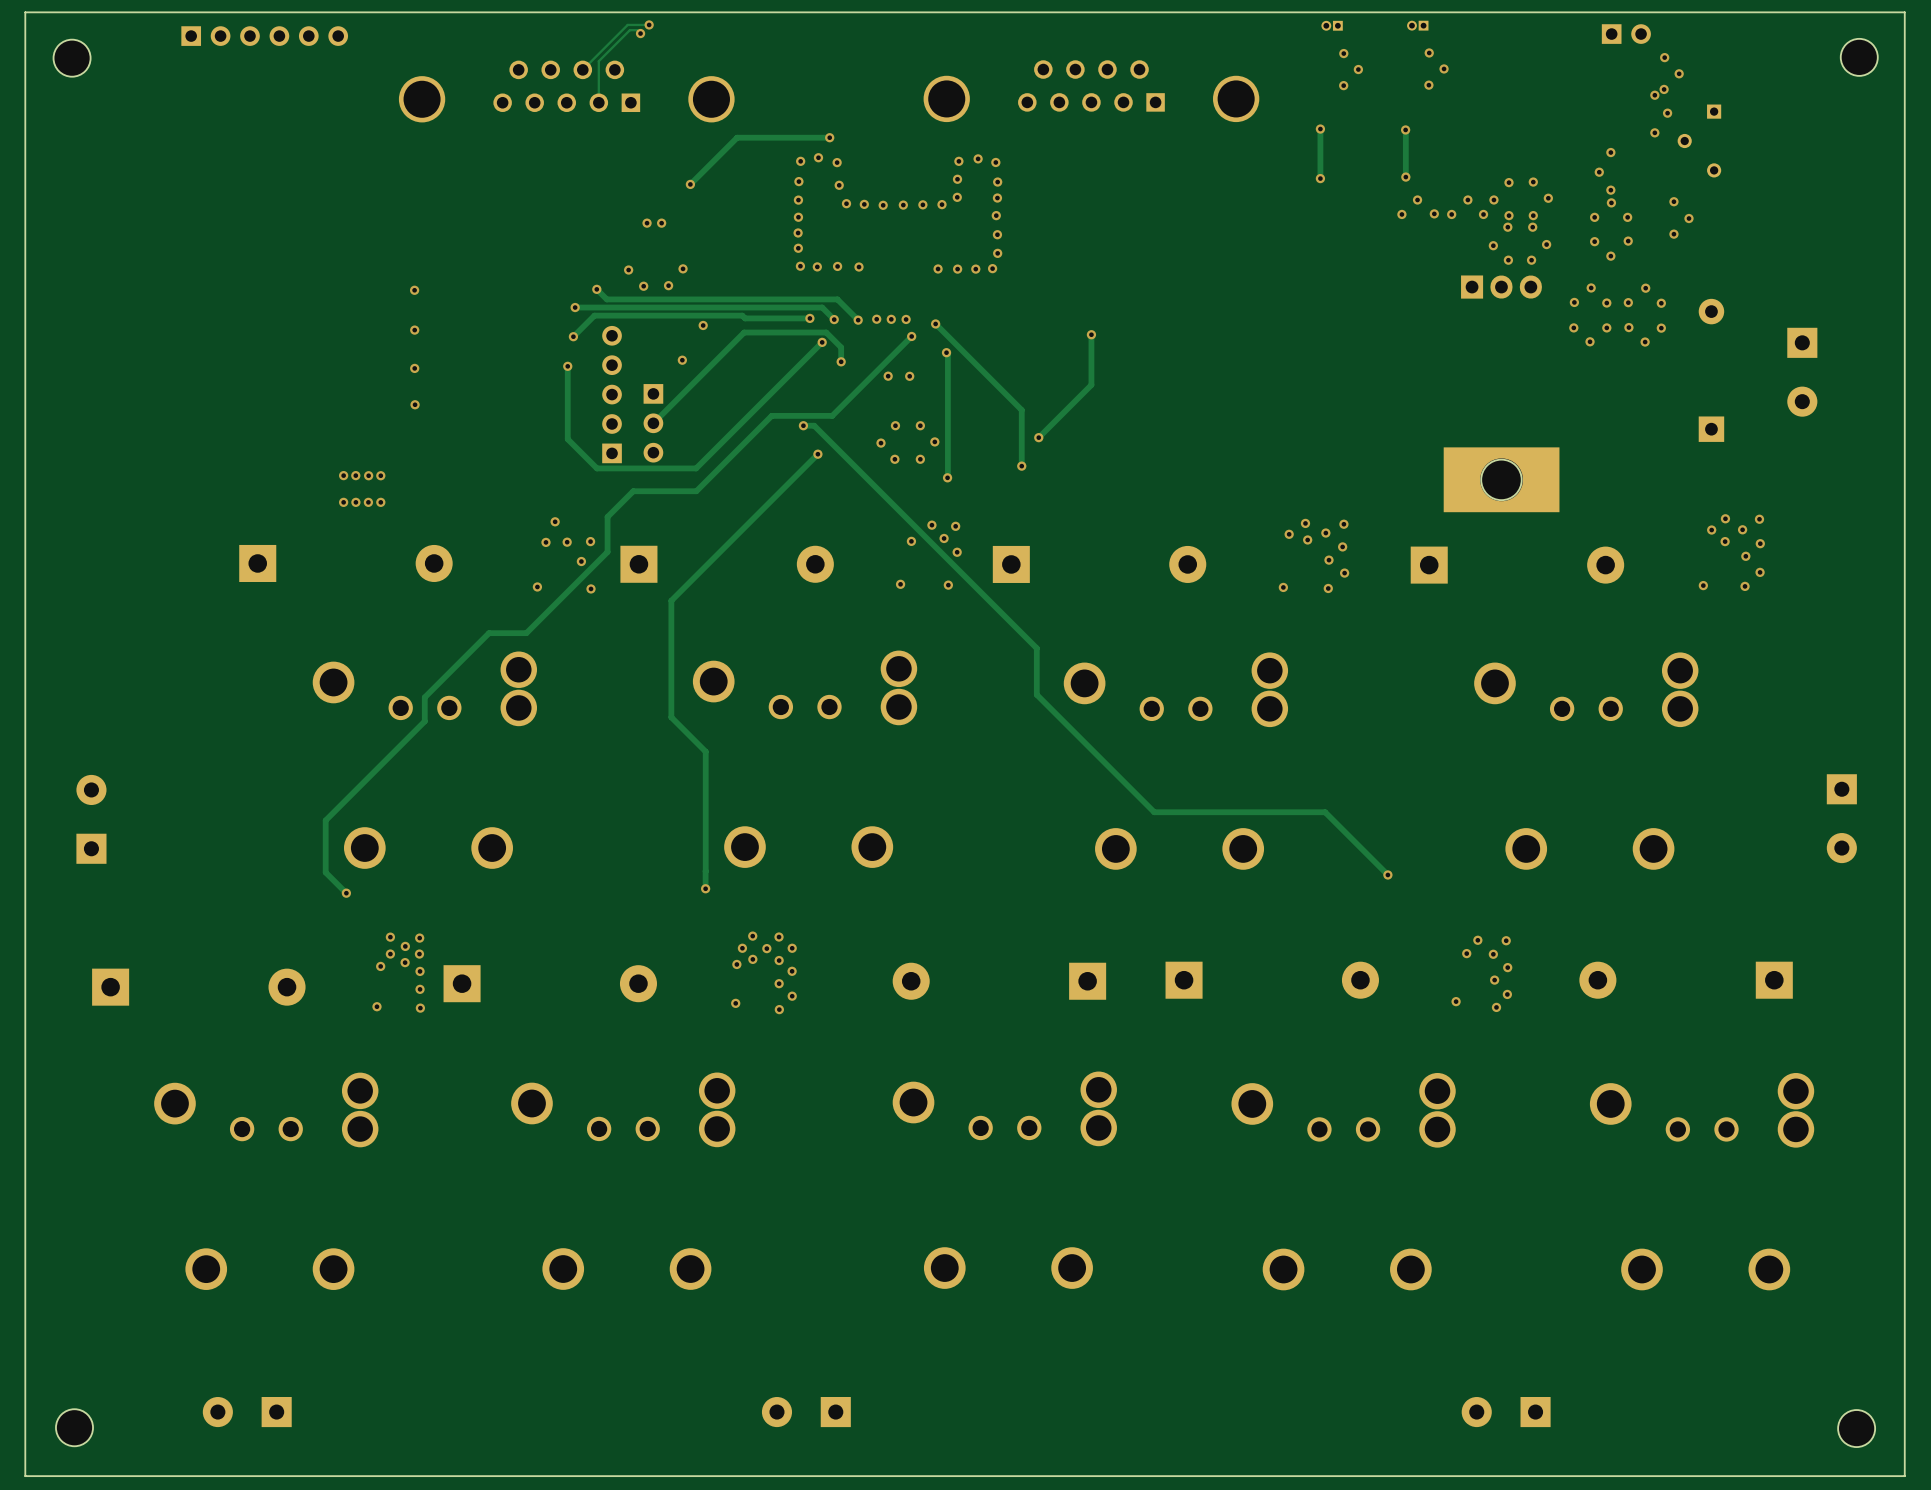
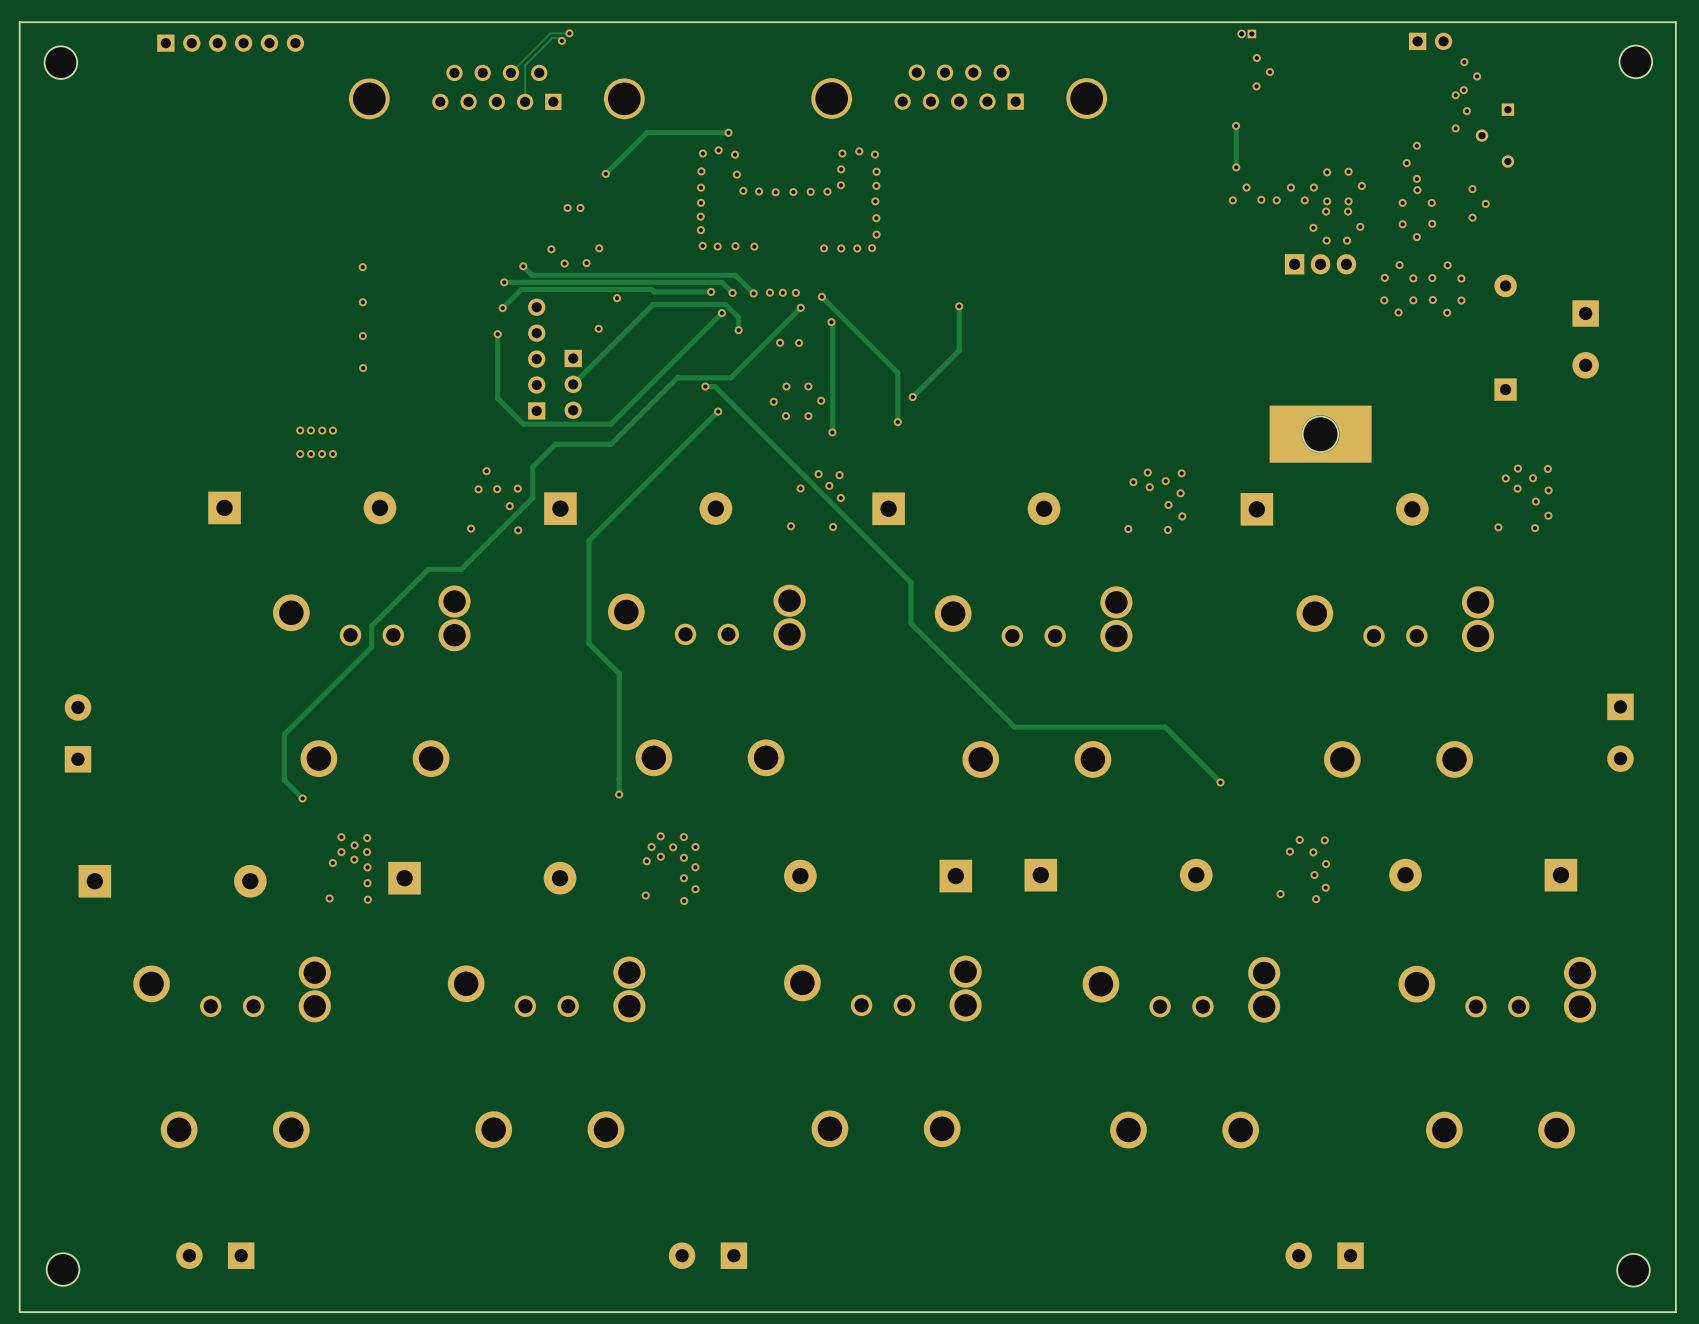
part: (1332, 25) -> none
via: (1343, 53) -> none
via: (1358, 69) -> none
via: (1343, 85) -> none
track: (1320, 129) (1320, 178) -> none
via: (1320, 129) -> none
via: (1320, 178) -> none

